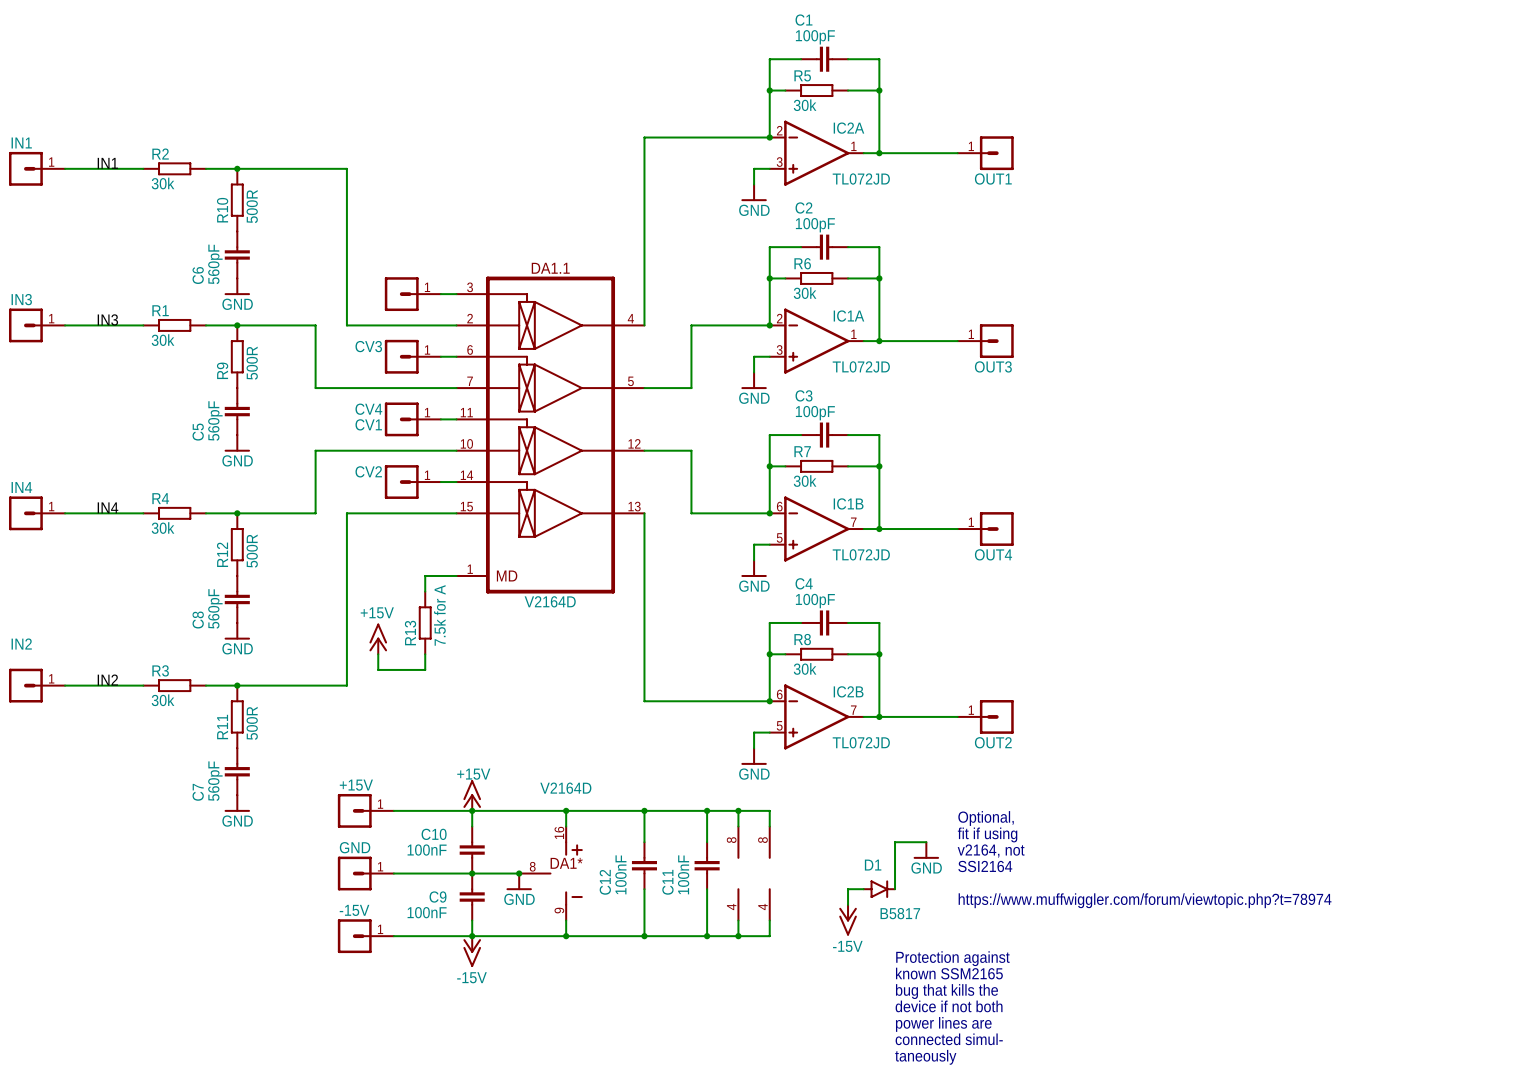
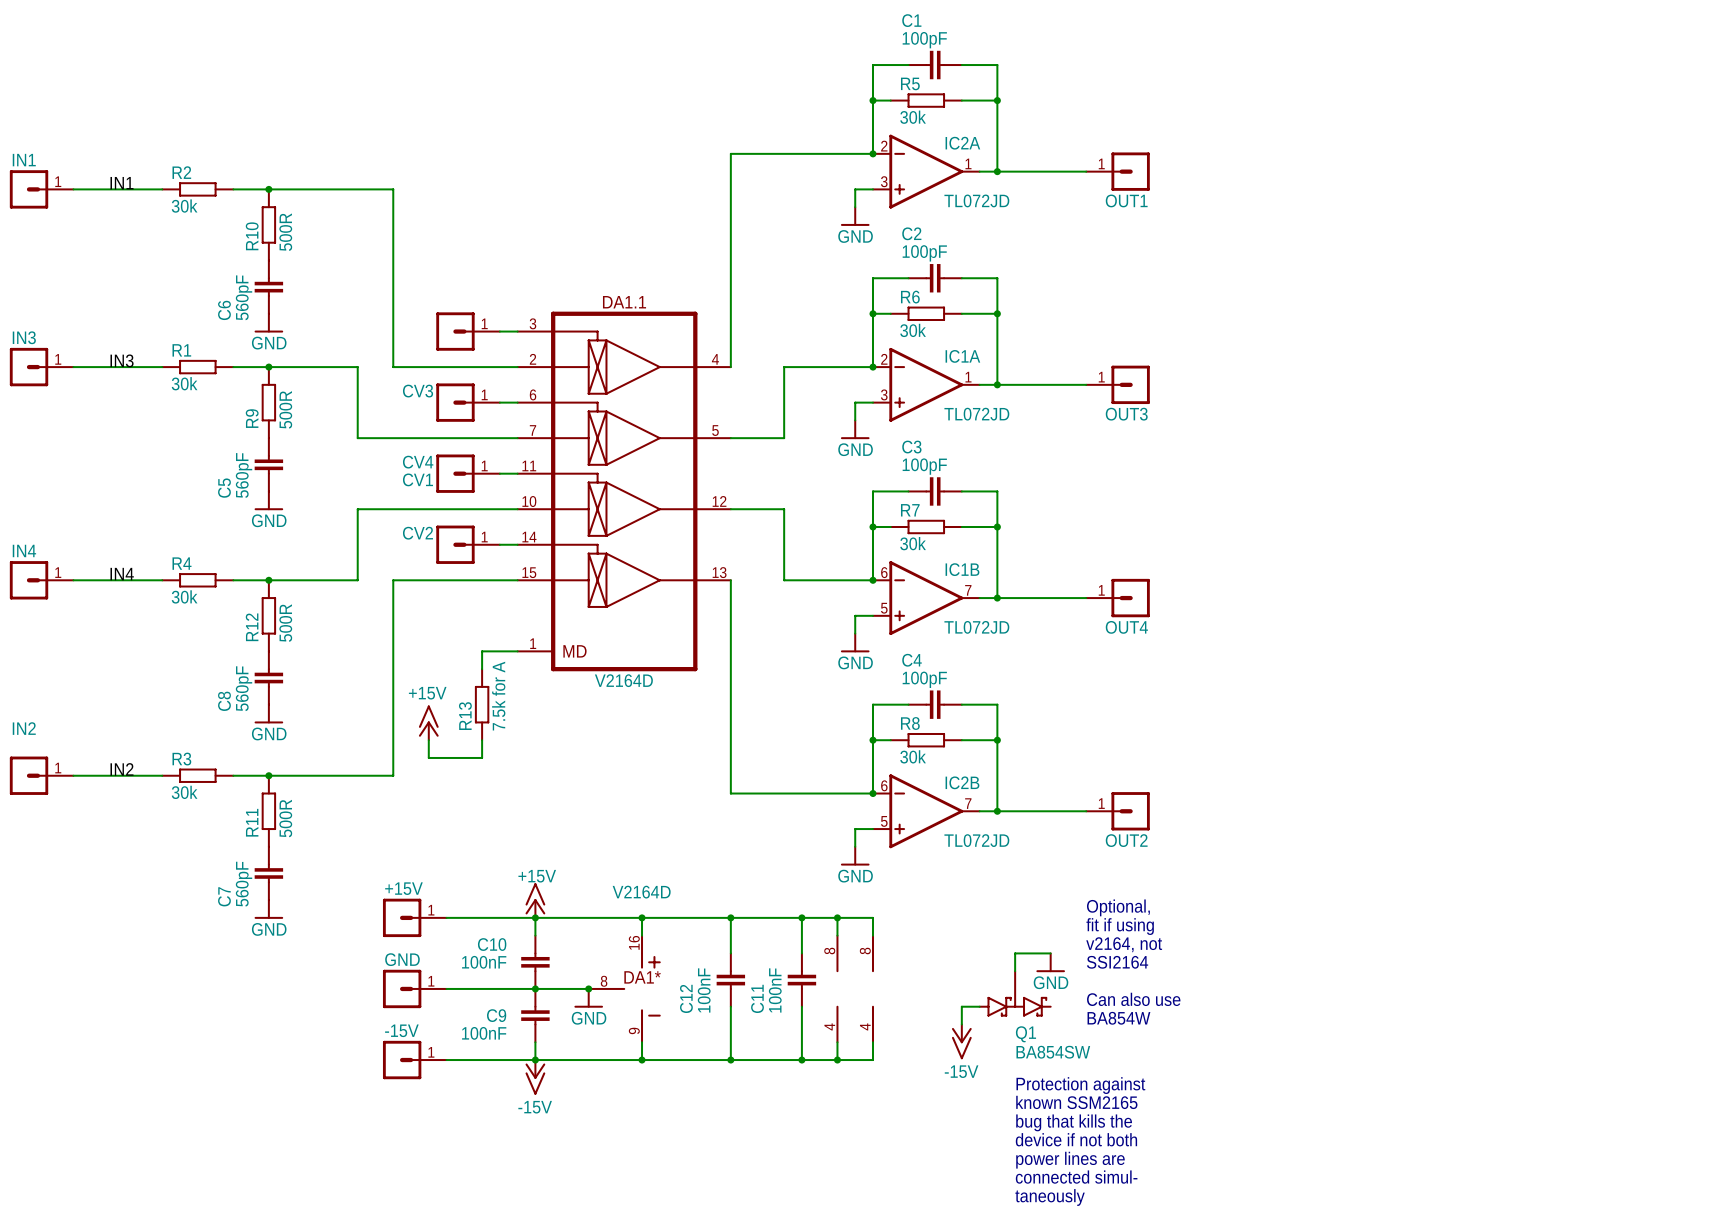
text: none -> Optional, (1118, 907)
text: Optional, (986, 818) -> fit if using (1120, 926)
text: fit if using (987, 834) -> v2164, not (1124, 944)
text: v2164, not (991, 850) -> SSI2164 (1117, 962)
text: SSI2164 (985, 866) -> none
Q1: none -> BA854SW (1015, 993)
text: none -> Can also use (1133, 999)
D1: B5817 (879, 889) -> none
text: https://www.muffwiggler.com/forum/viewtopic.php?t=78974 (1145, 900) -> BA854W (1118, 1018)

